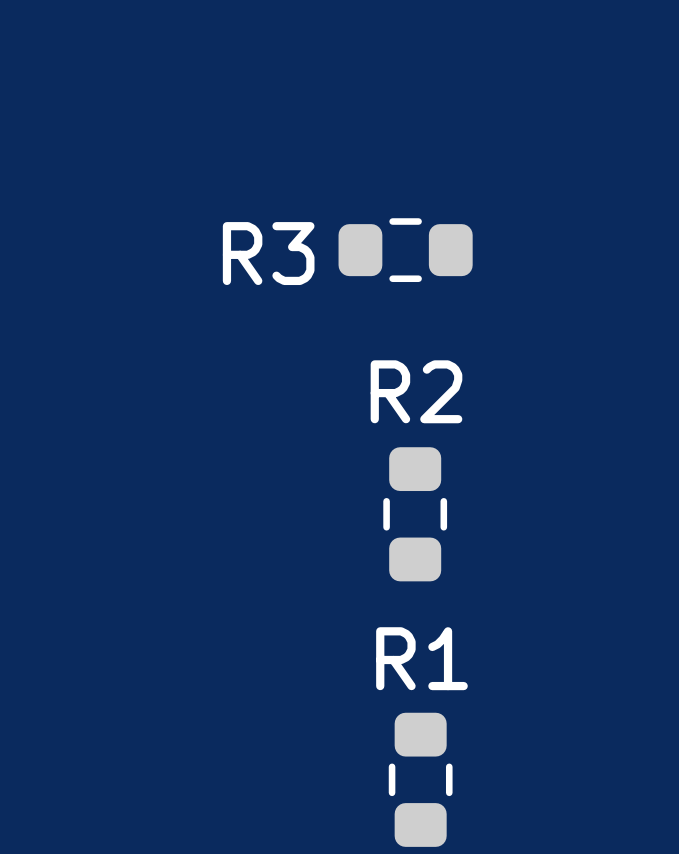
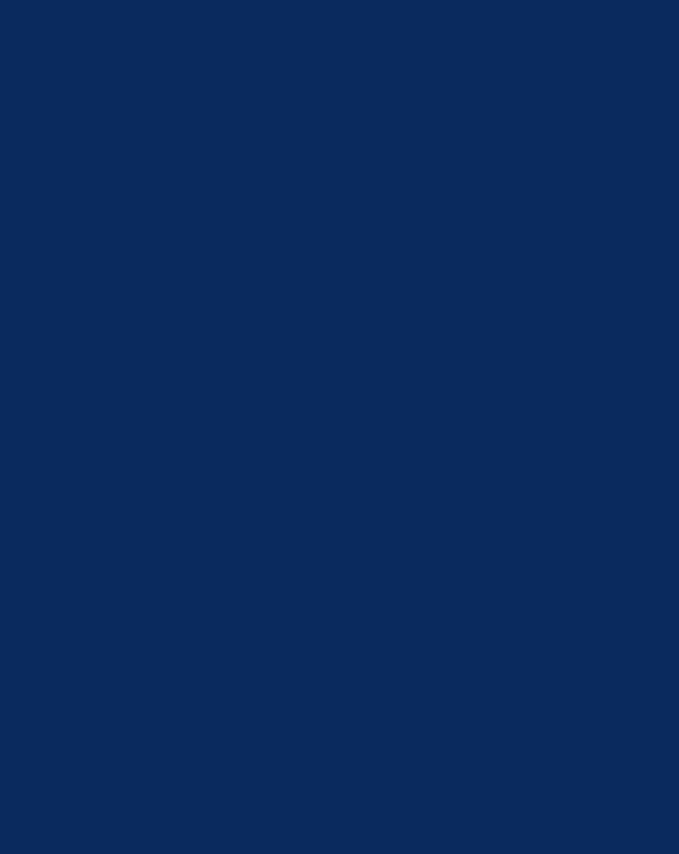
R3: (405, 250) -> none
R2: (415, 514) -> none
R1: (420, 779) -> none

